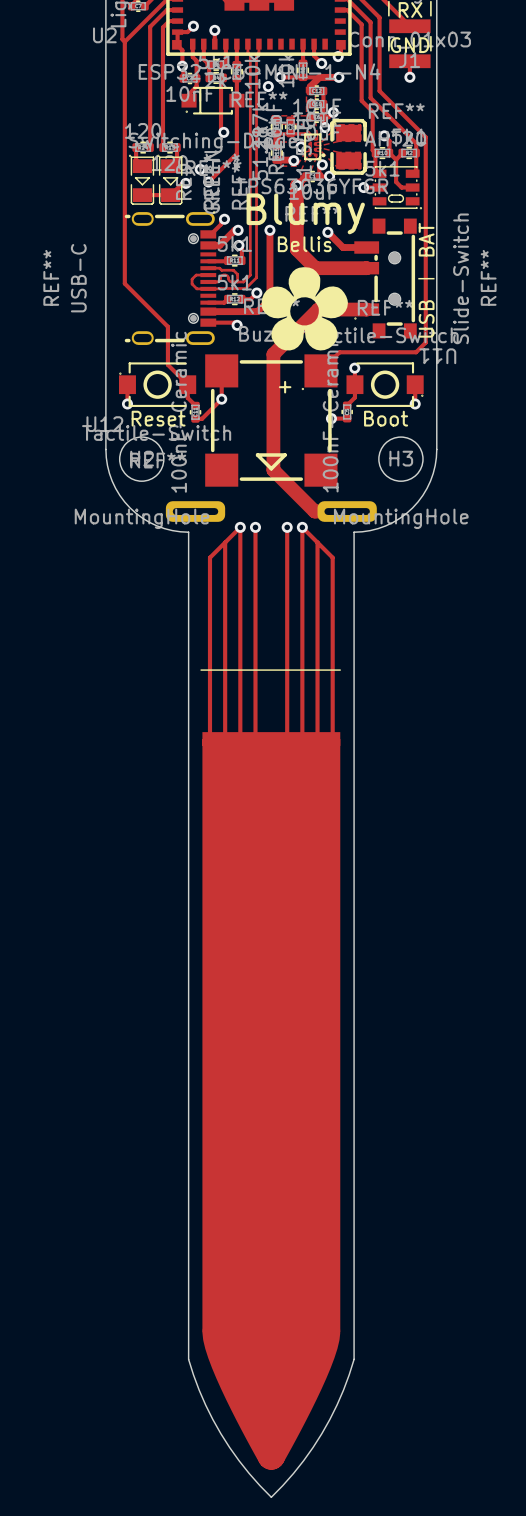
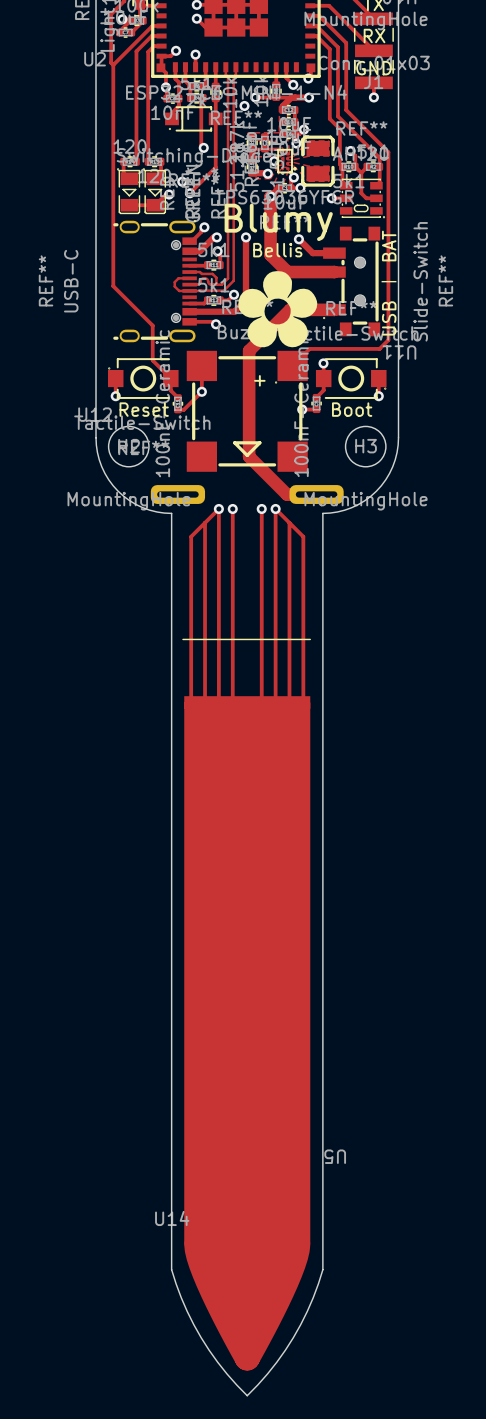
U5: none -> (335, 1156)
U14: none -> (172, 1218)

